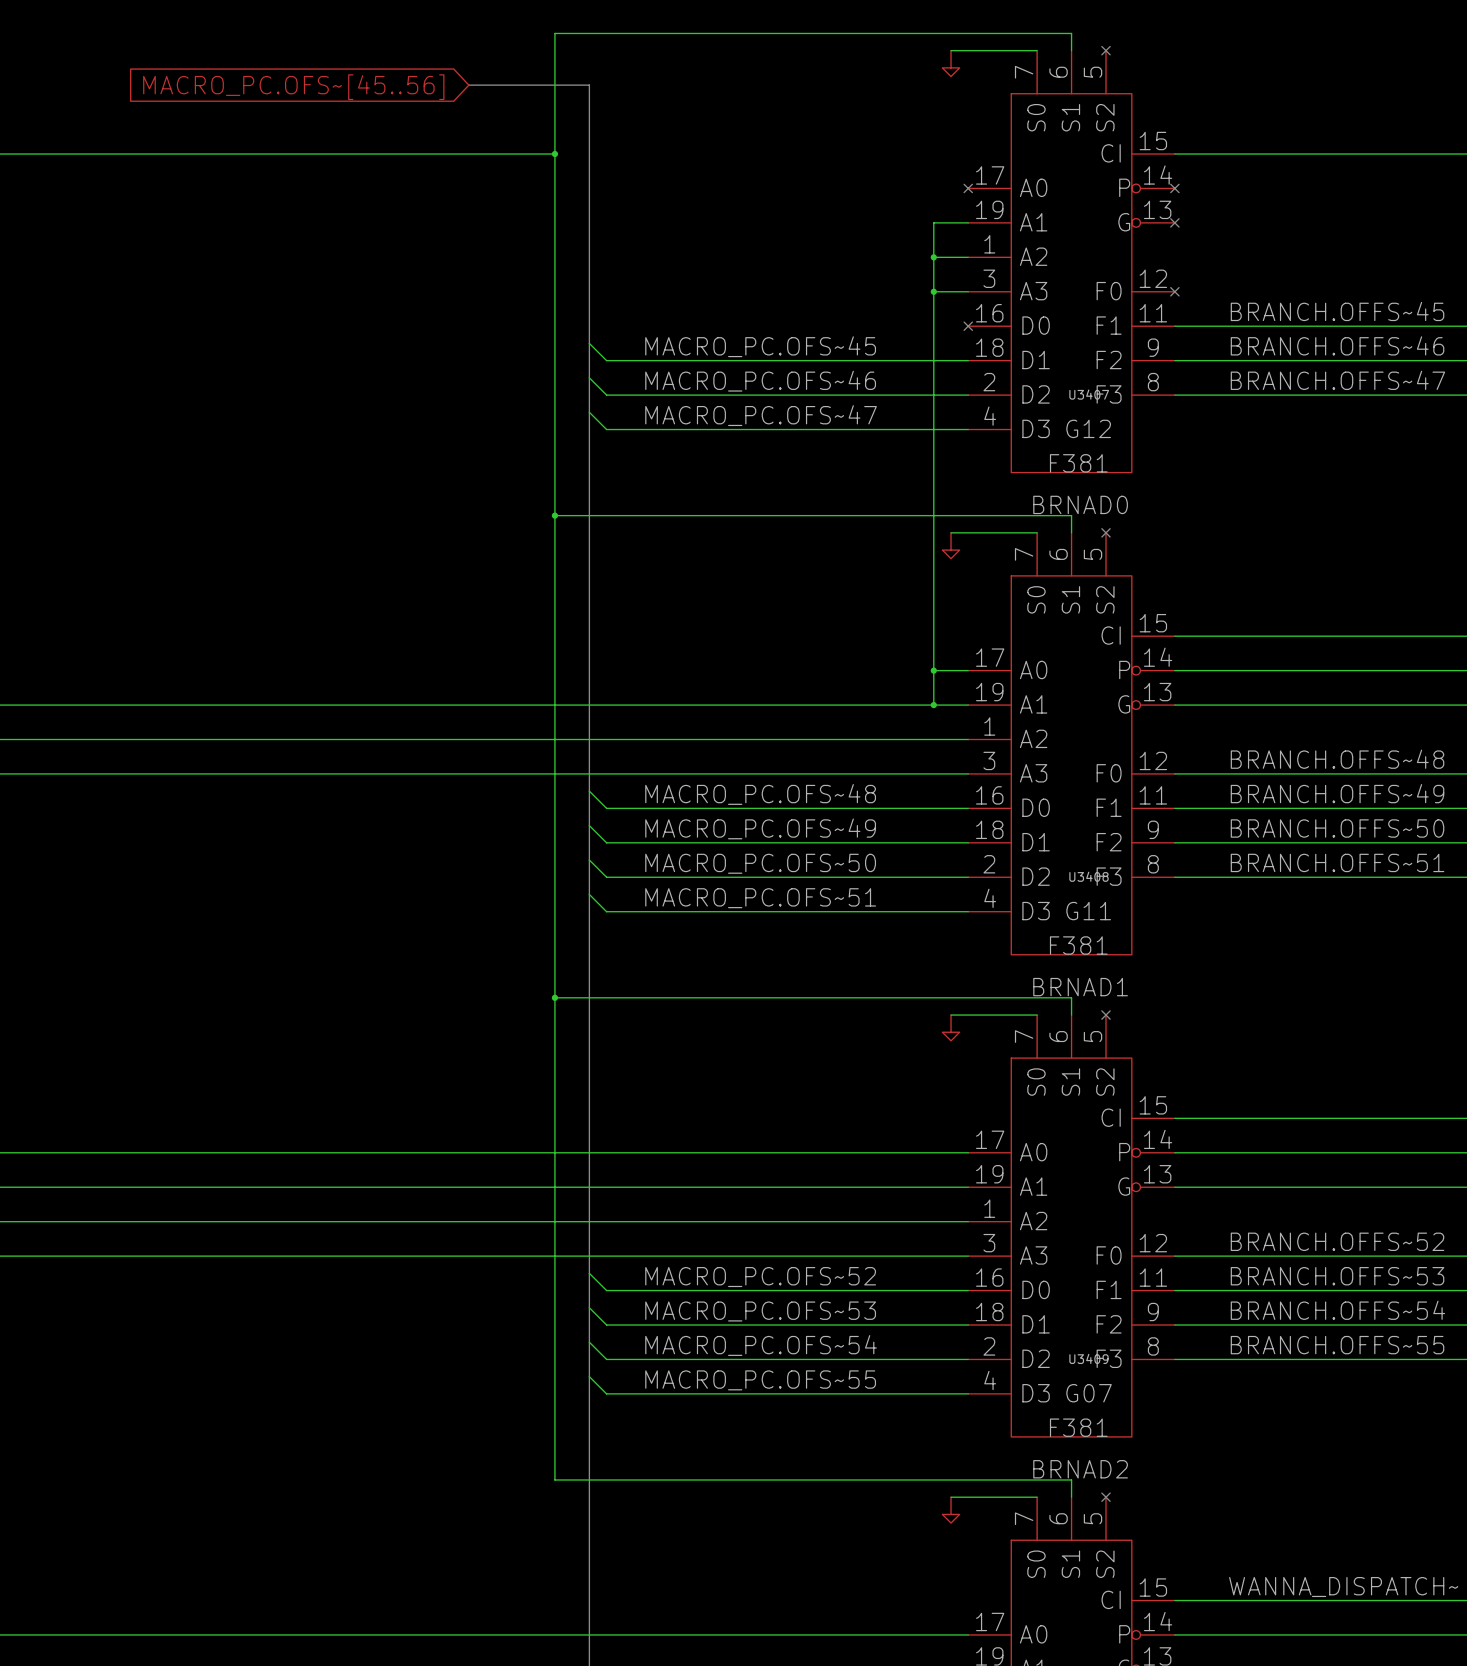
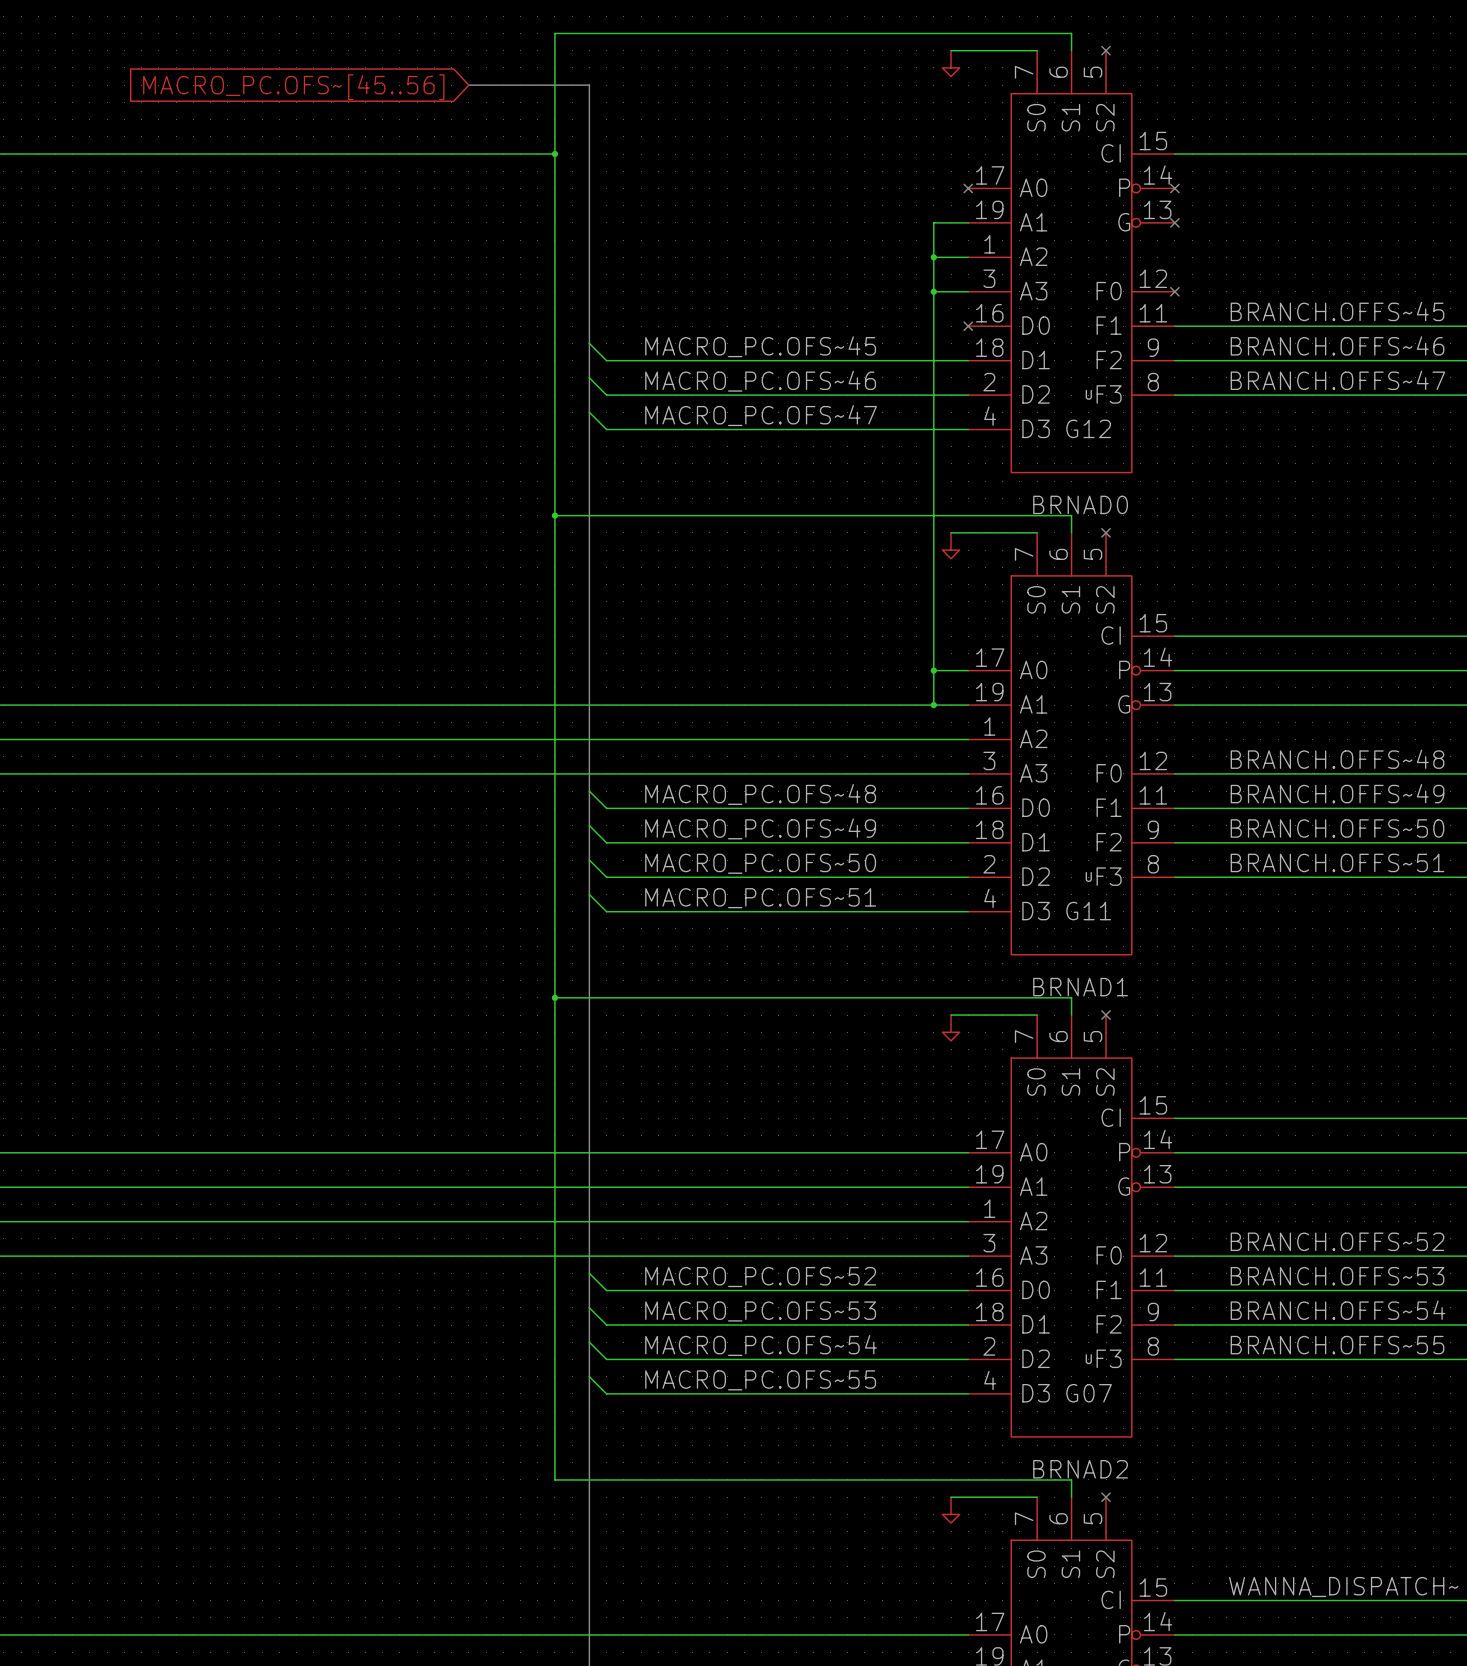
U3407 name: U3407 (1089, 394) -> U (1088, 394)
U3407 value: F381 (1078, 463) -> none
U3408 name: U3408 (1088, 876) -> U (1088, 876)
U3408 value: F381 (1078, 945) -> none
U3409 name: U3409 (1088, 1358) -> U (1088, 1359)
U3409 value: F381 (1078, 1427) -> none

